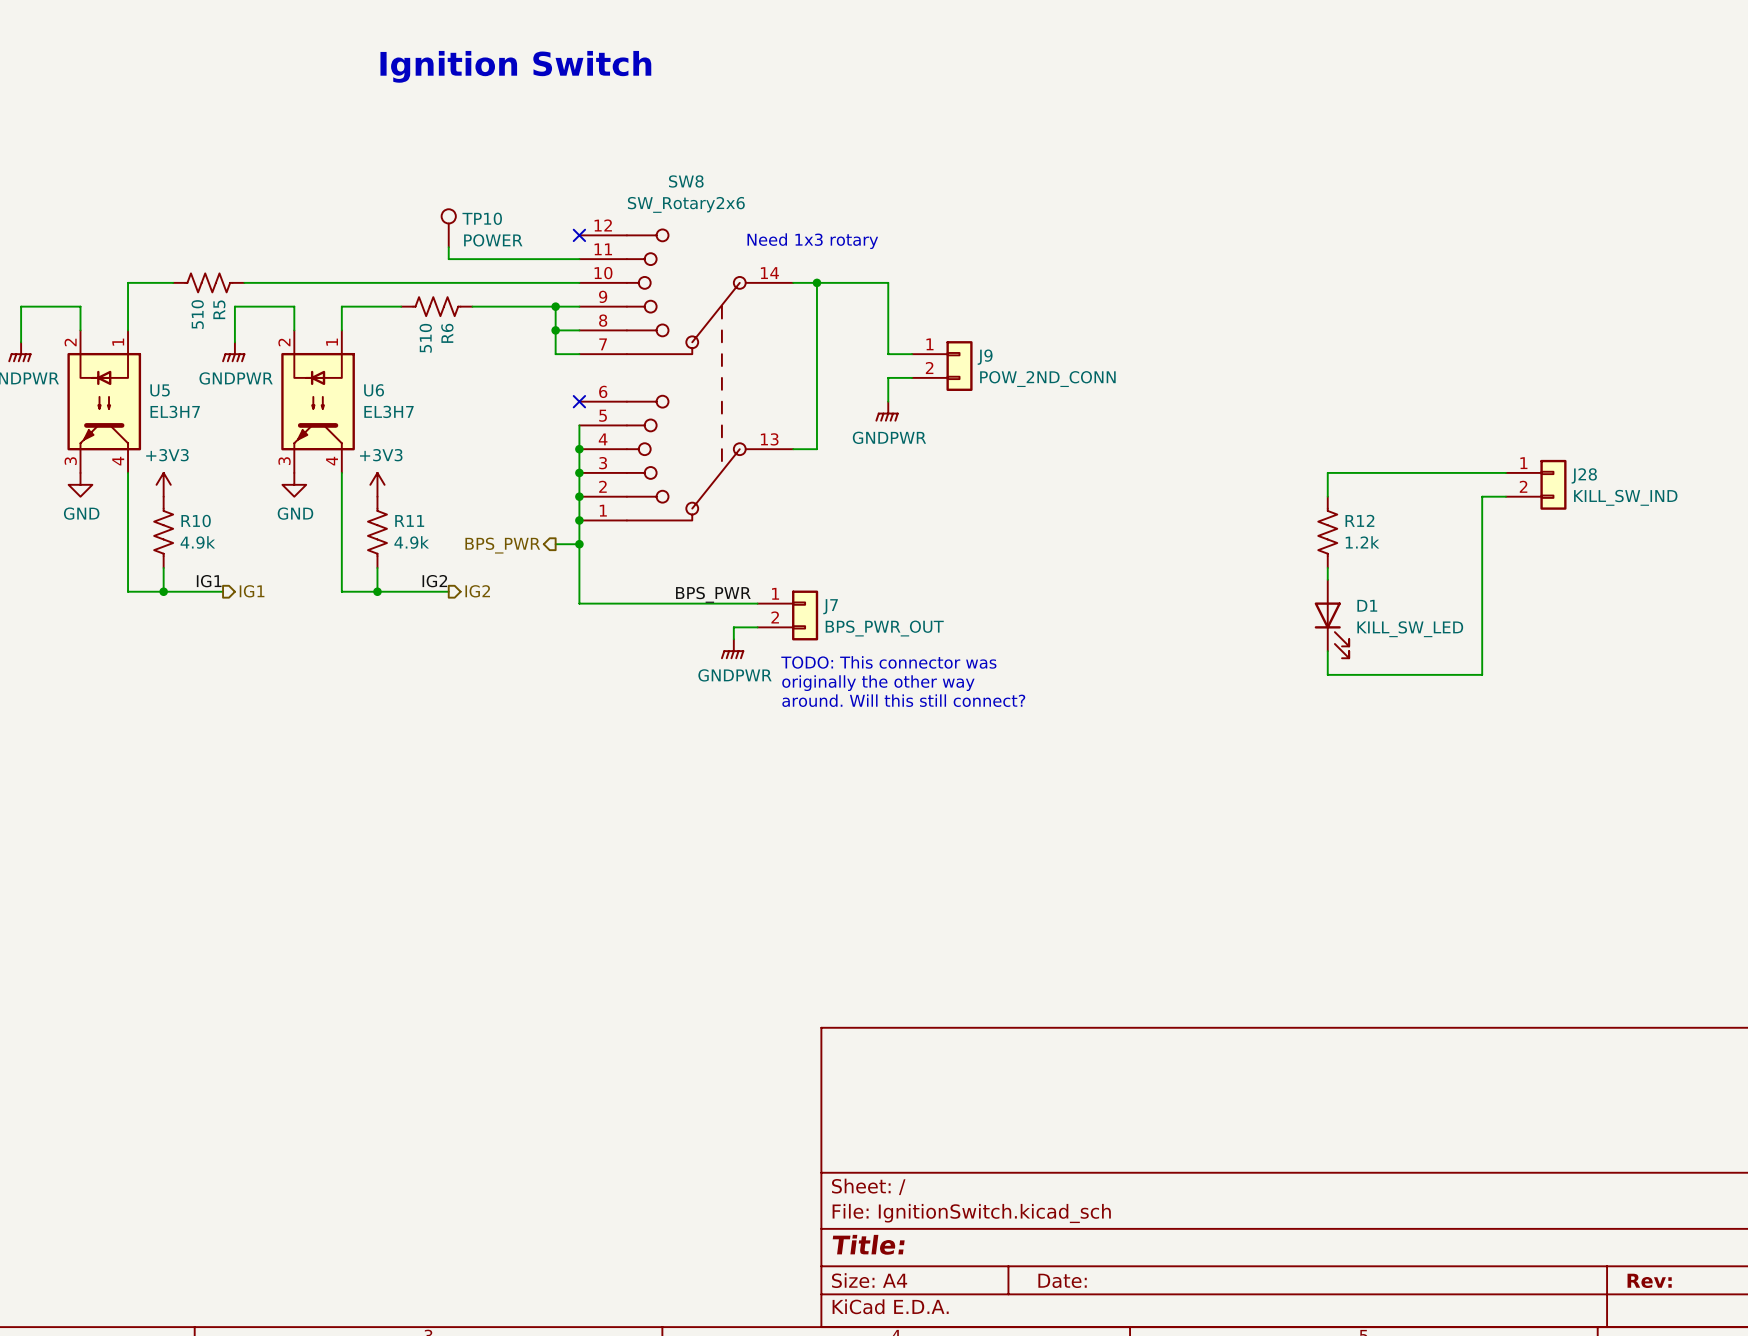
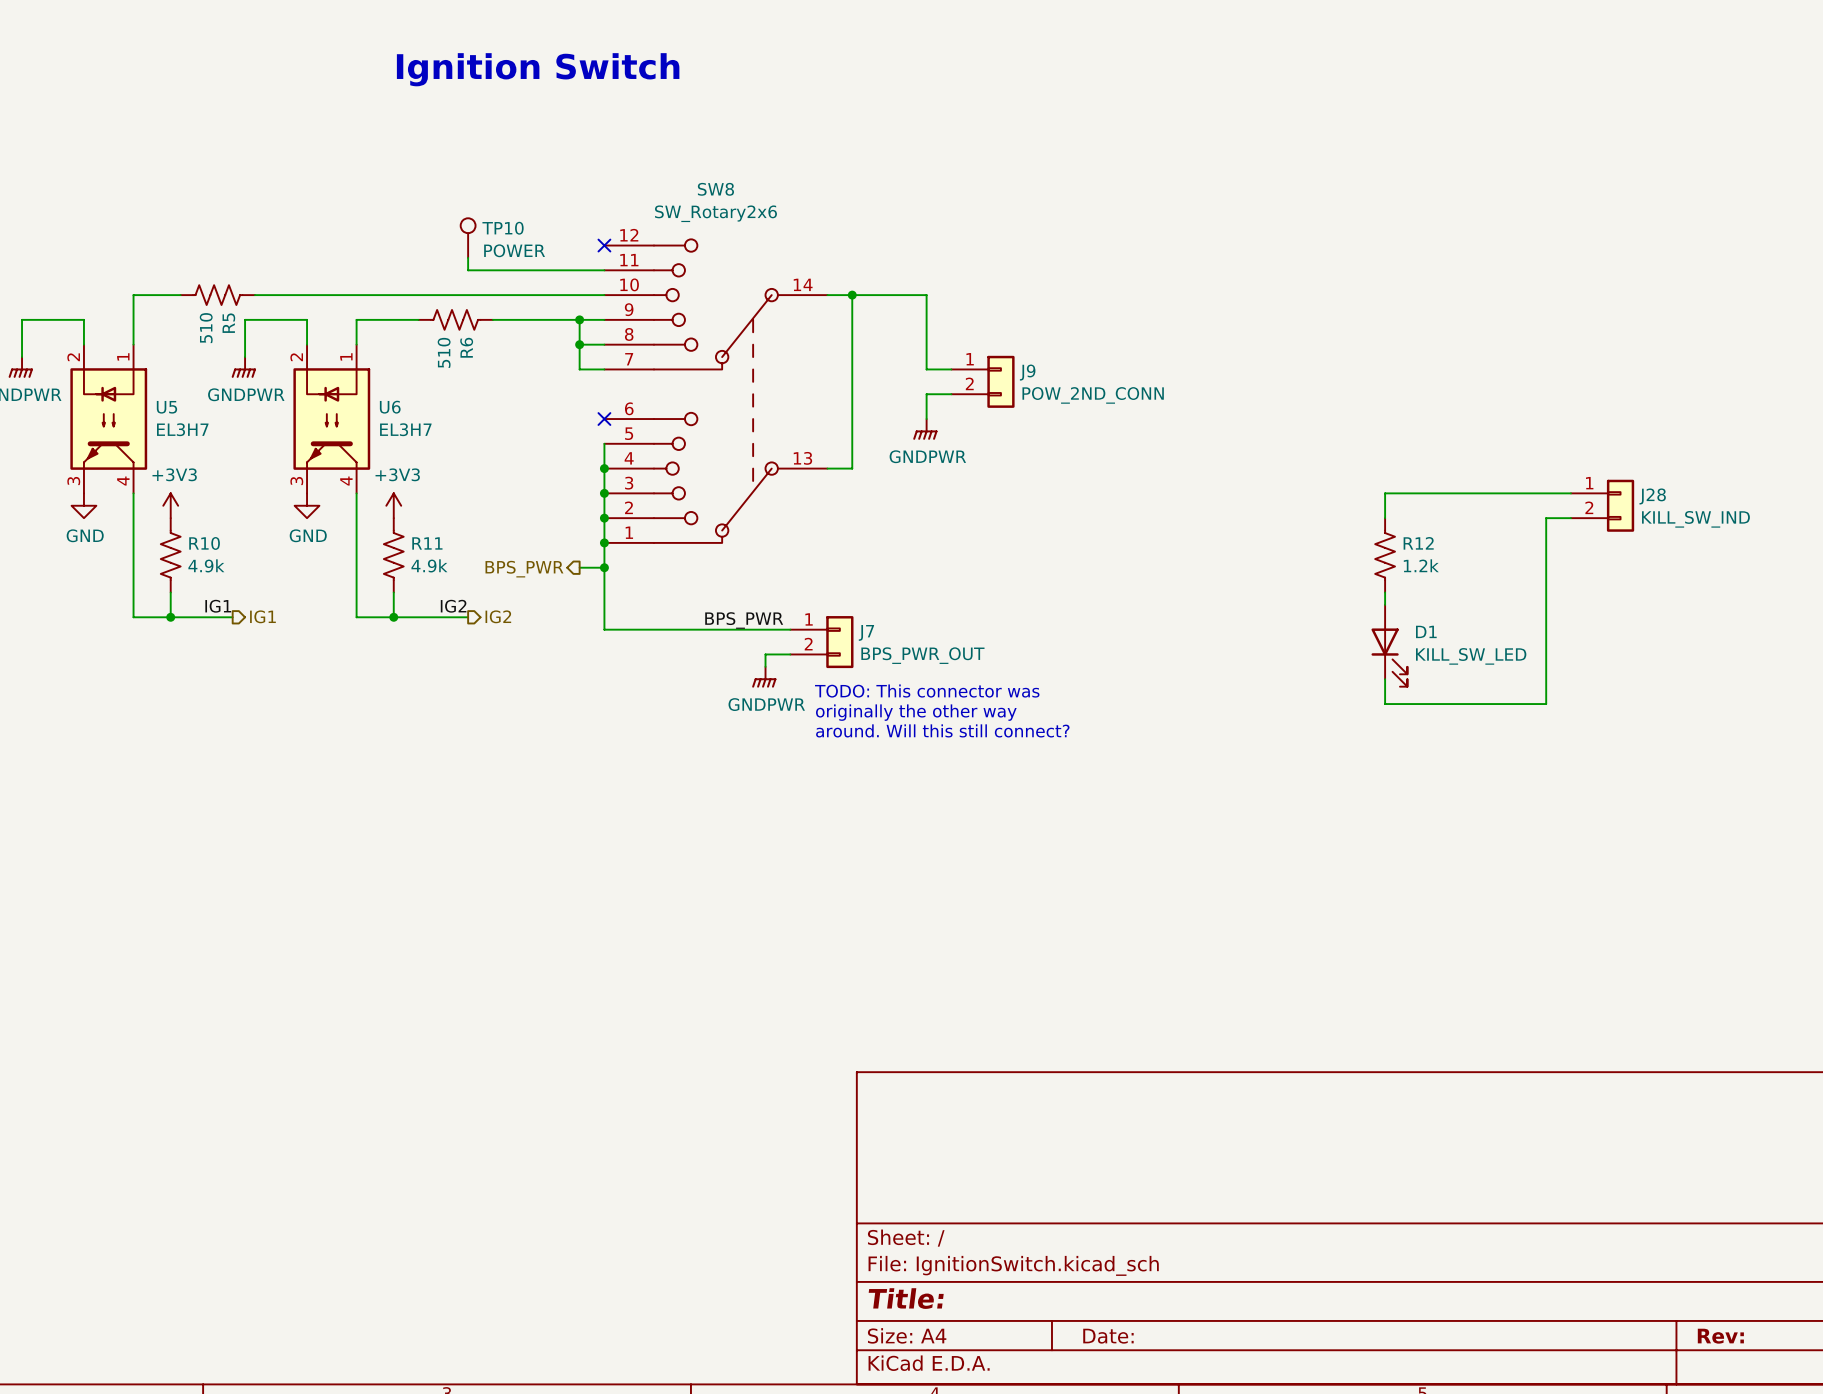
text: Need 1x3 rotary (812, 241) -> none

